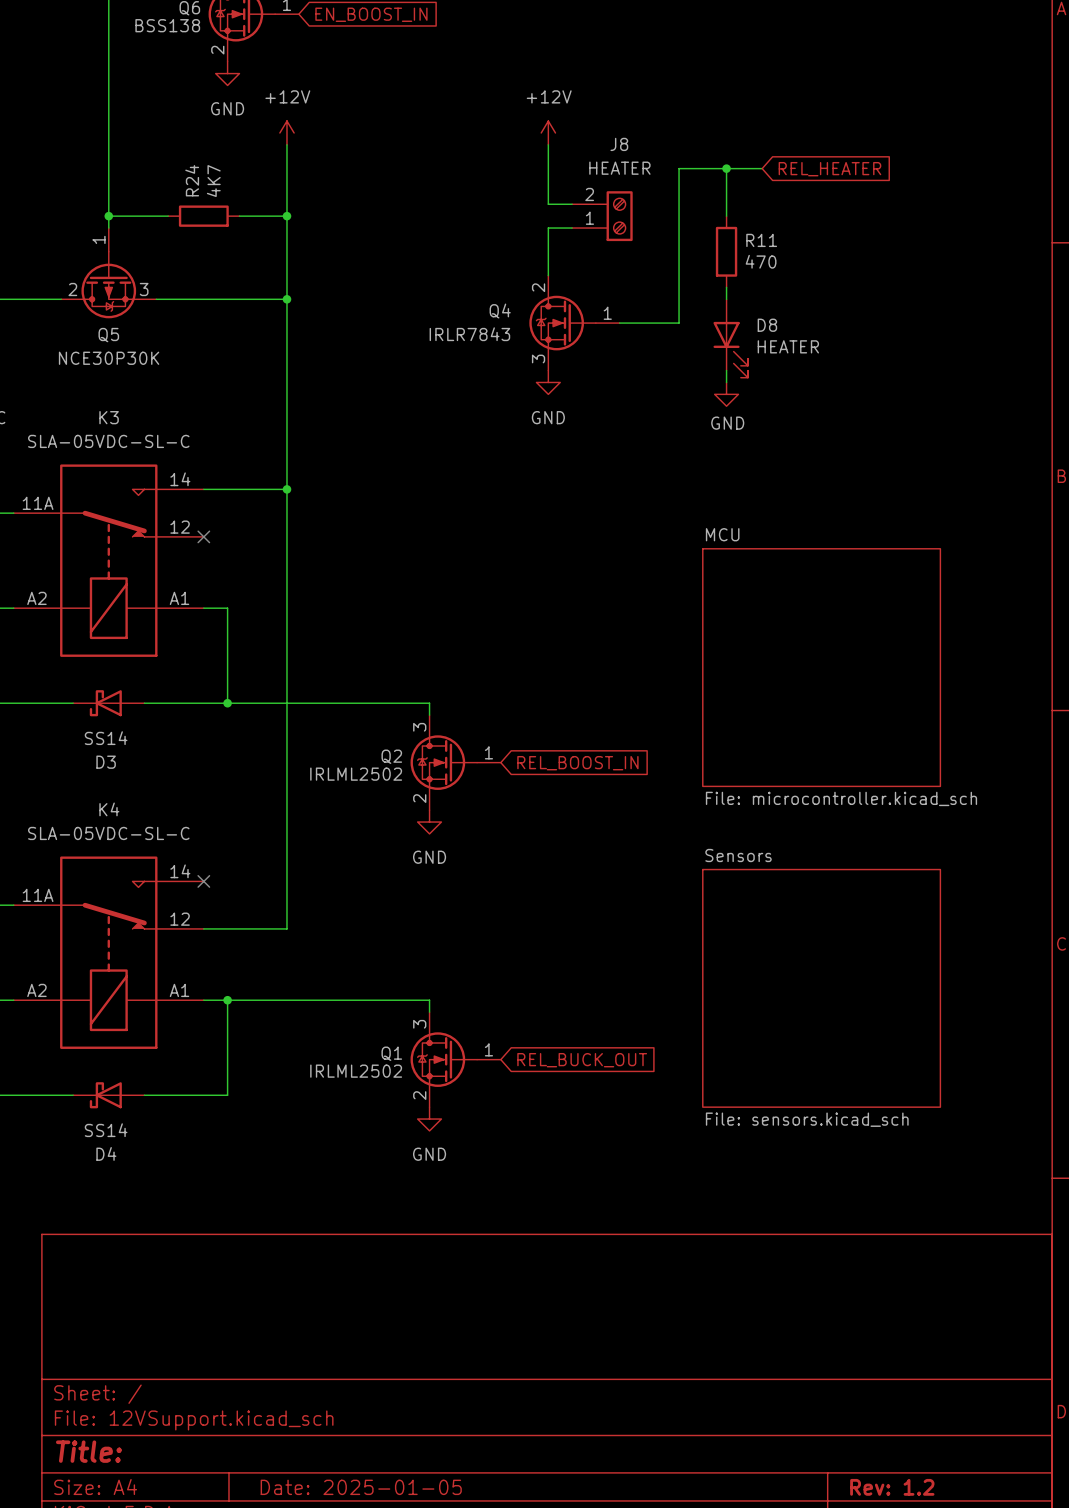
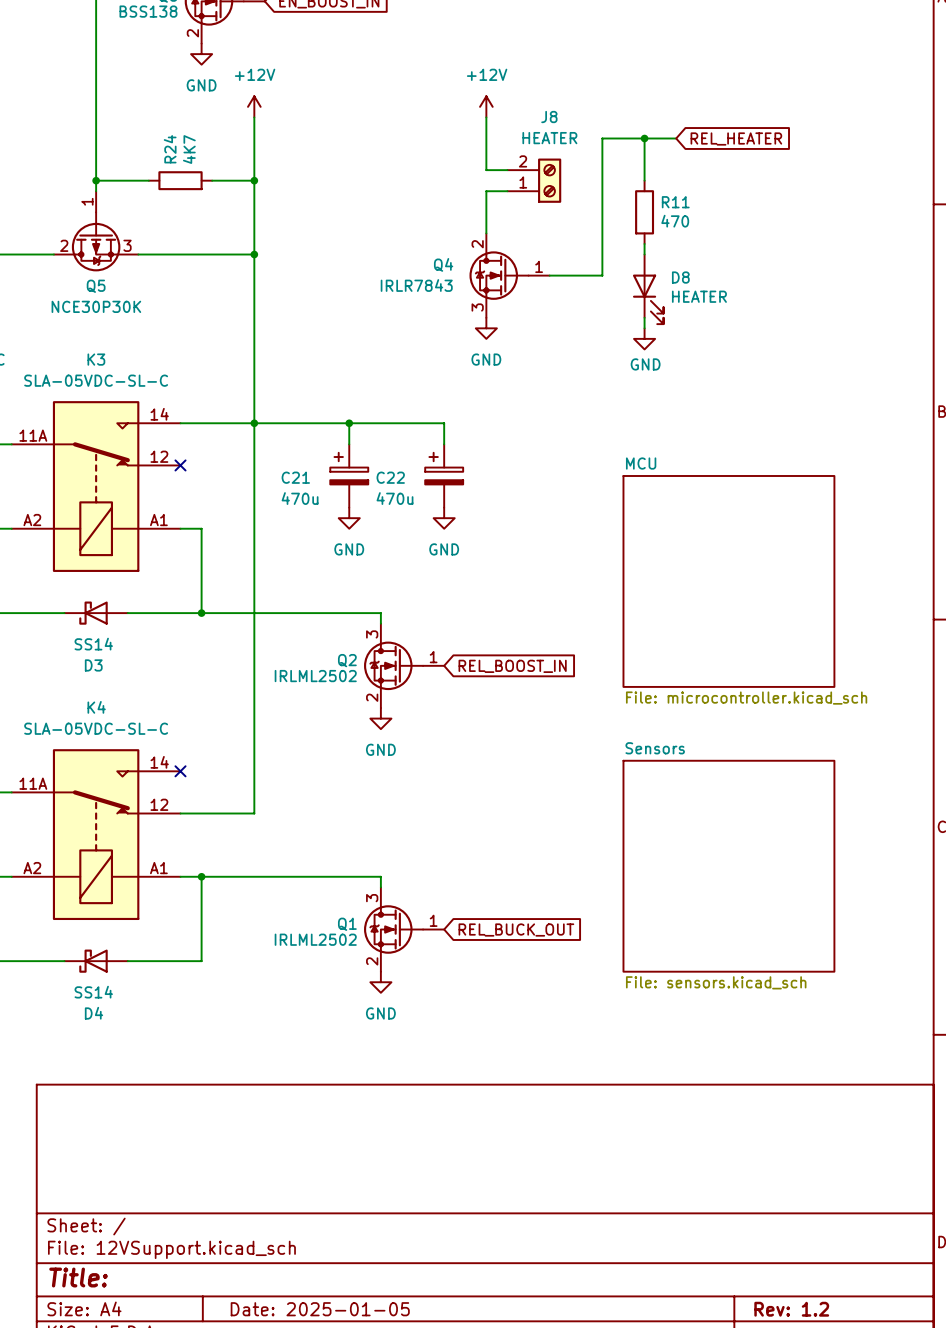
wire: none -> (254, 423) (444, 423) (444, 444)
wire: none -> (349, 423) (349, 444)
junction: none -> (349, 423)
C21: none -> 470u (349, 475)
C22: none -> 470u (444, 475)
power symbol: none -> GND (349, 518)
power symbol: none -> GND (444, 518)

